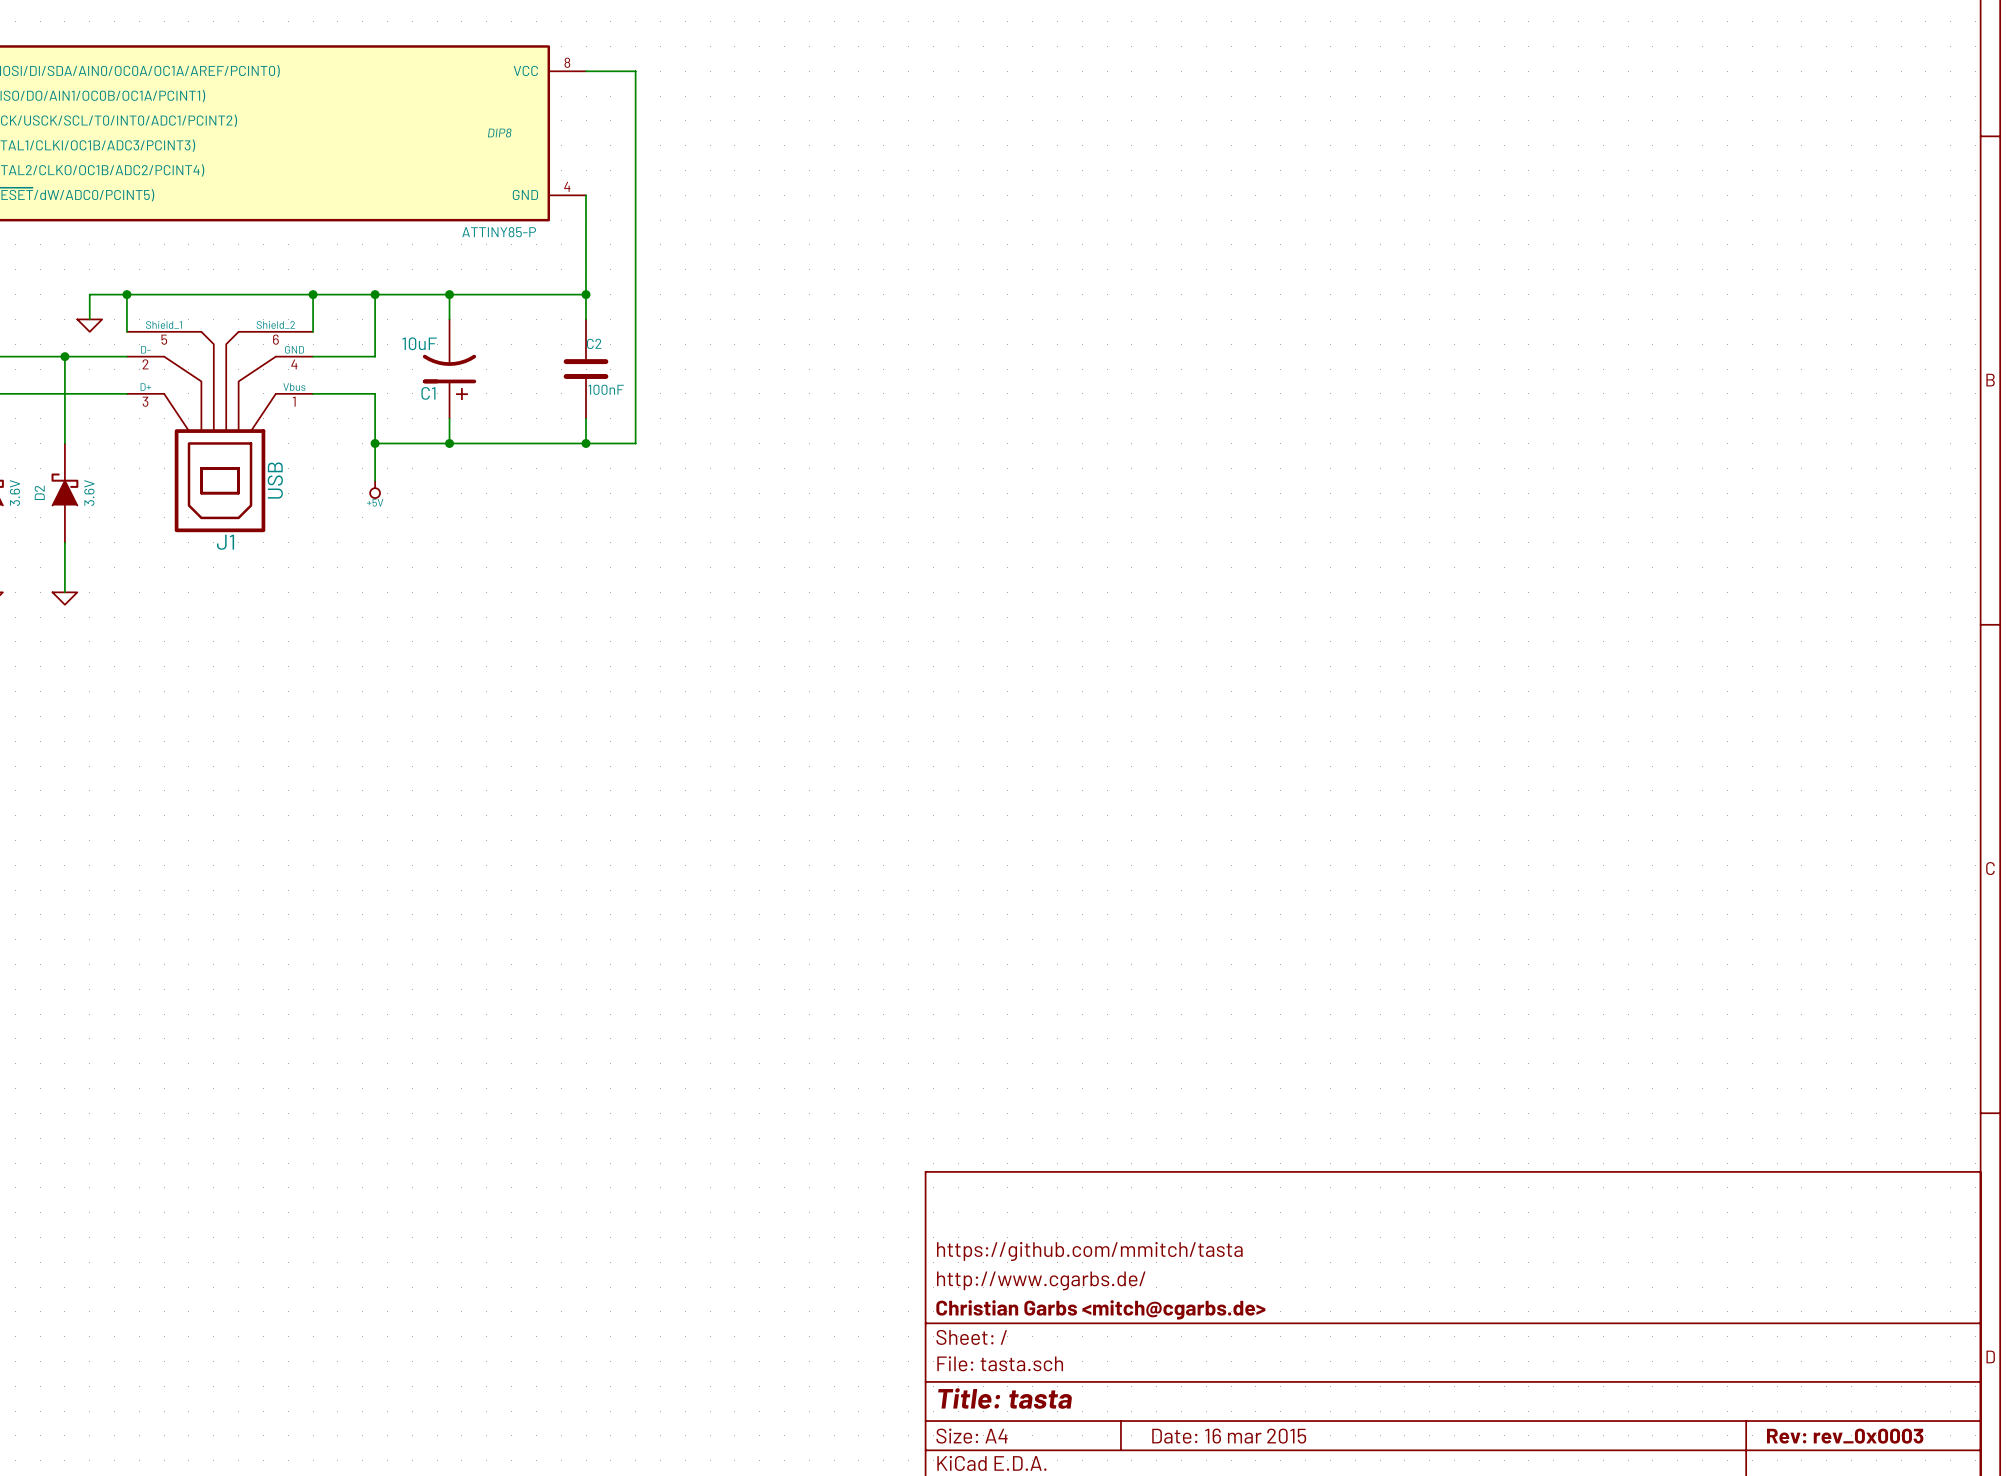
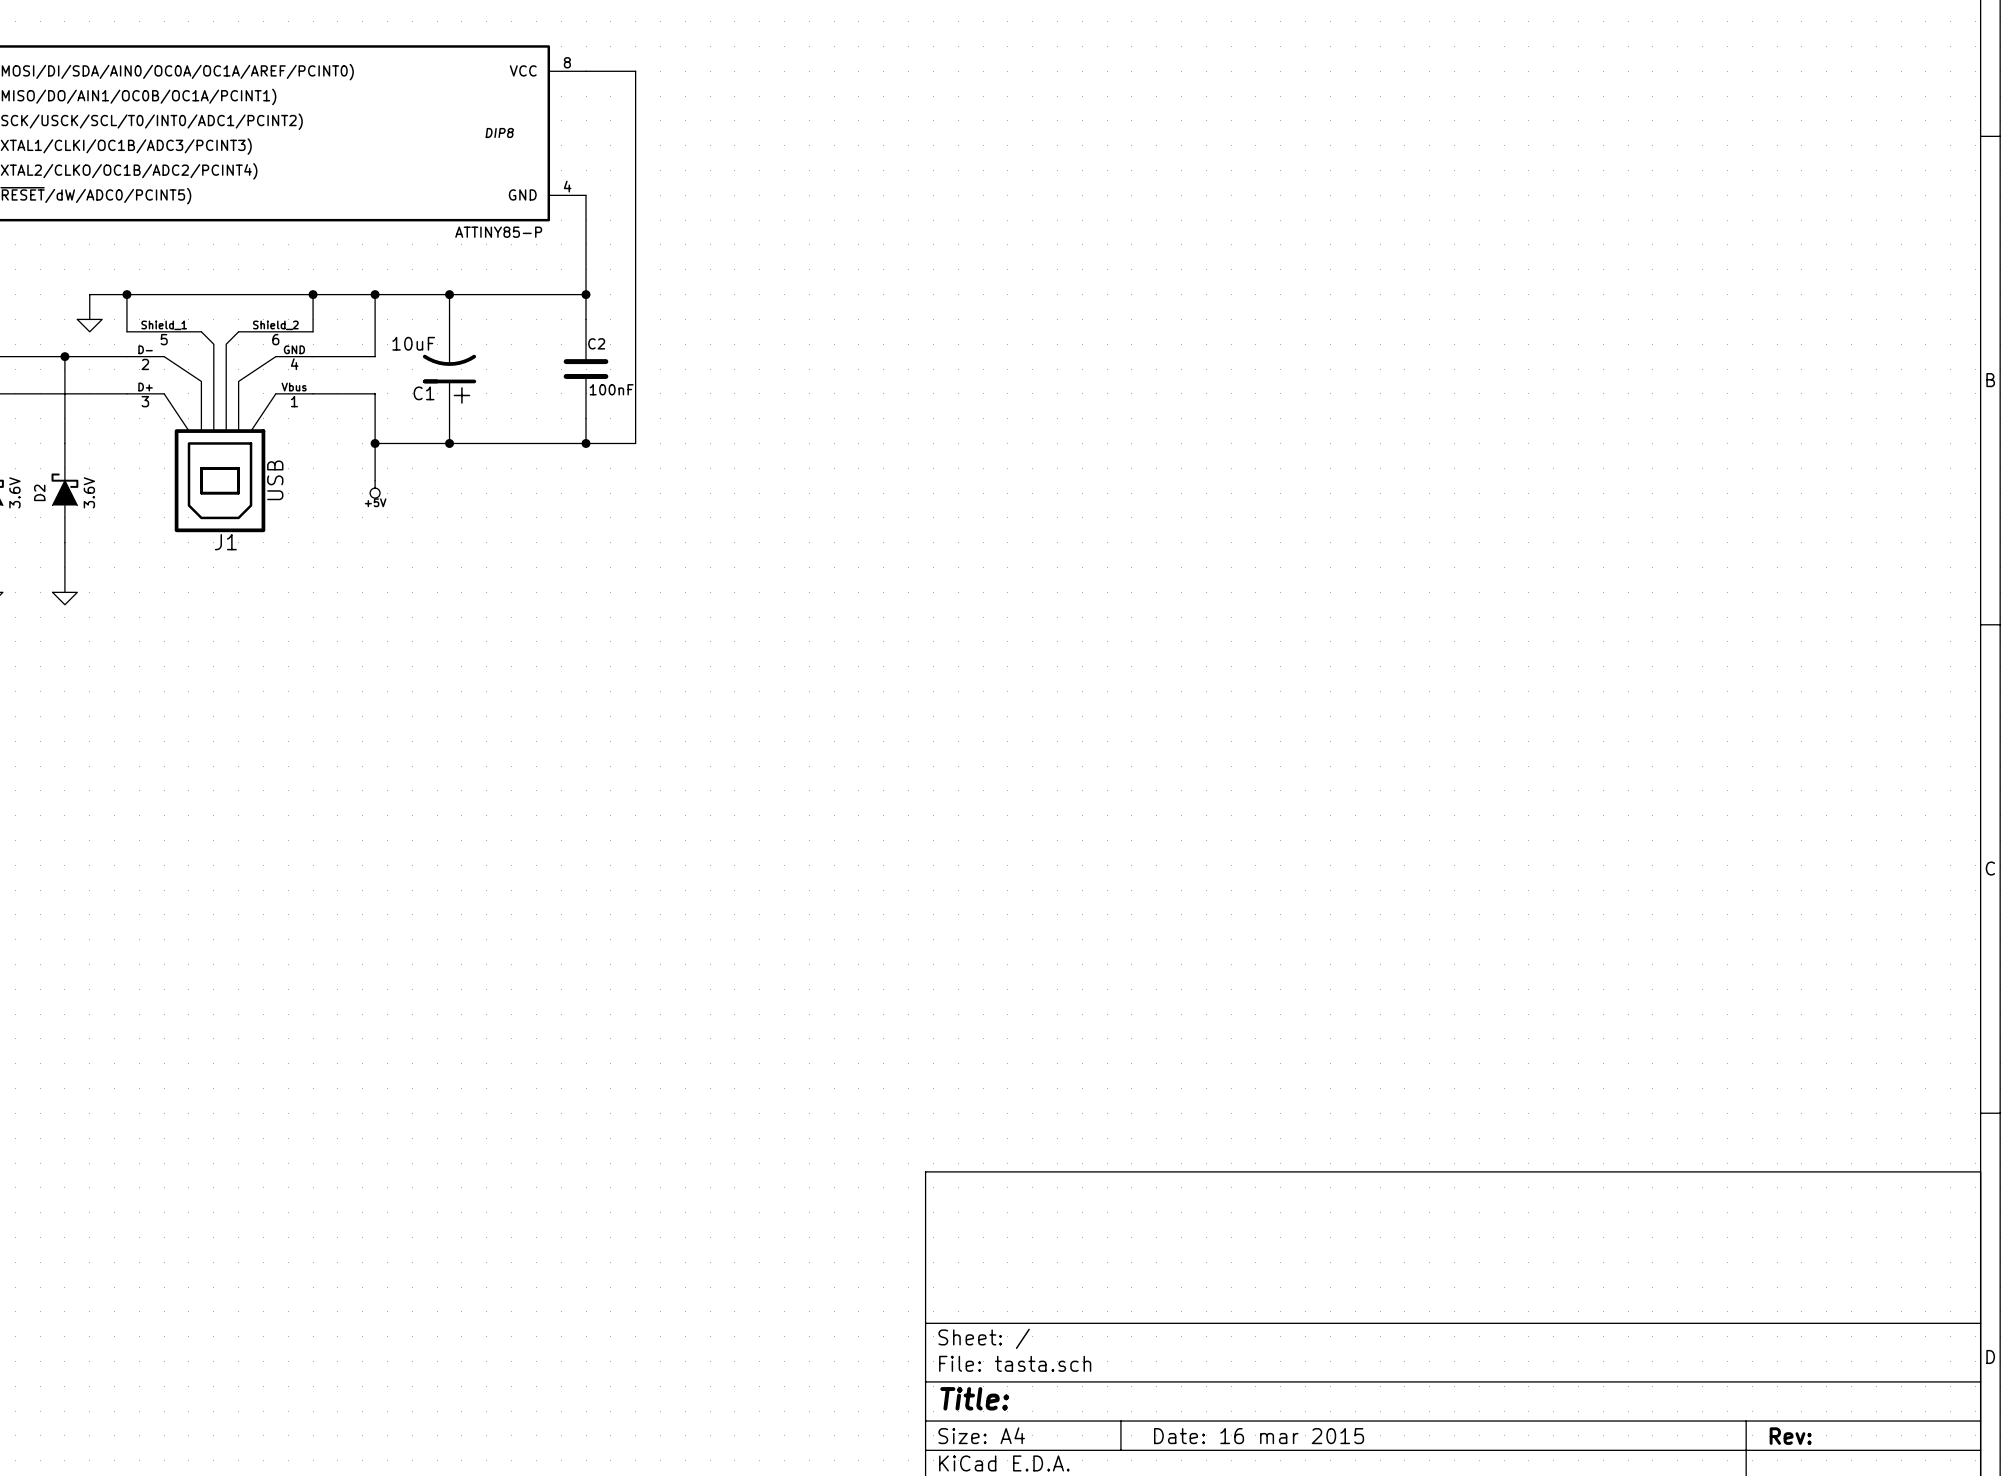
title block: https://github.com/mmitch/tasta (1089, 1251) -> none
title block: http://www.cgarbs.de/ (1041, 1280) -> none
title block: Christian Garbs <mitch@cgarbs.de> (1100, 1309) -> none
title block: Title: tasta (1005, 1398) -> Title: (974, 1398)
title block: Rev: rev_0x0003 (1845, 1436) -> Rev: (1790, 1436)

